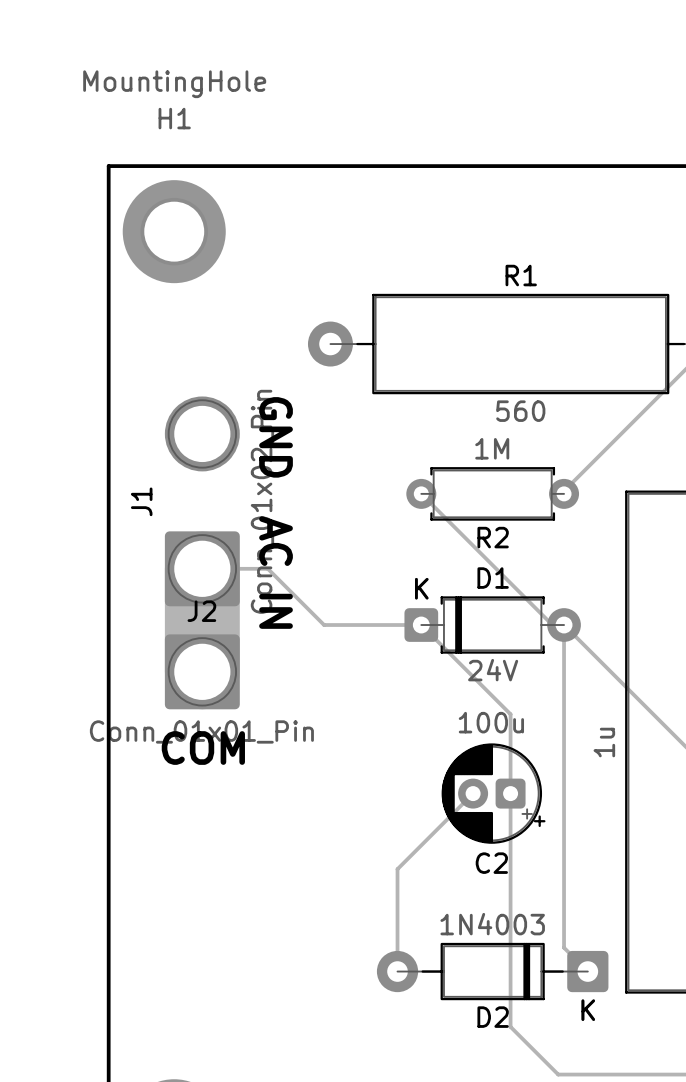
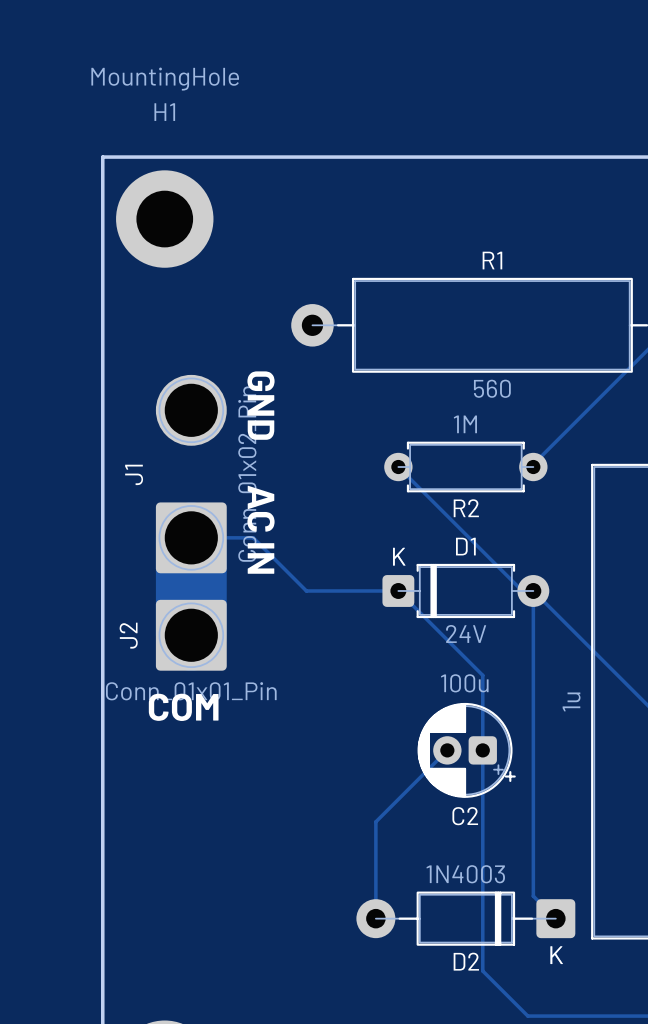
J2 name rotation: 0° (201, 611) -> 90° counterclockwise (128, 635)
J2 name position: J2 (201, 611) -> J2 (128, 635)

